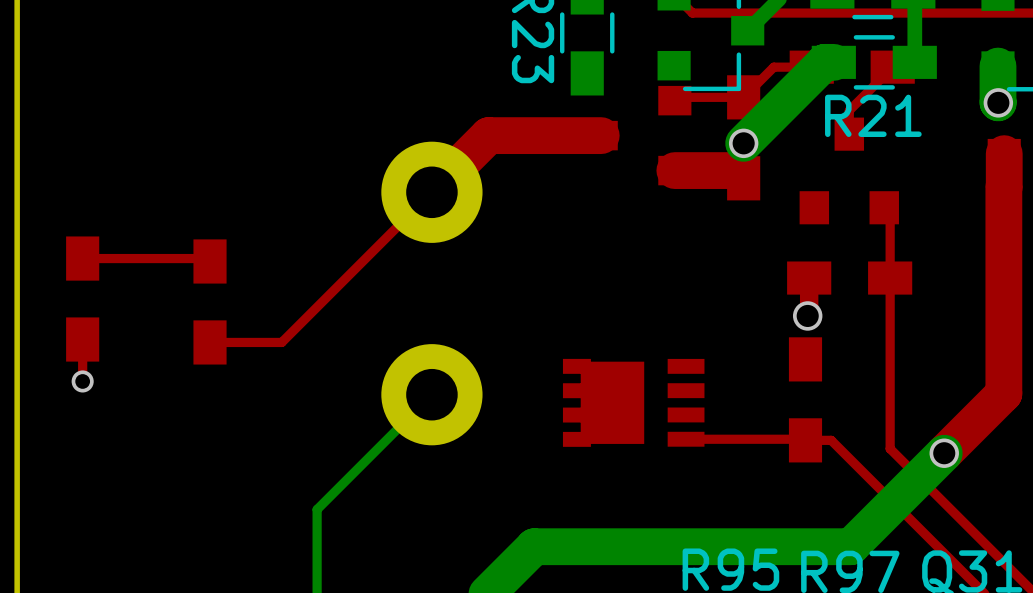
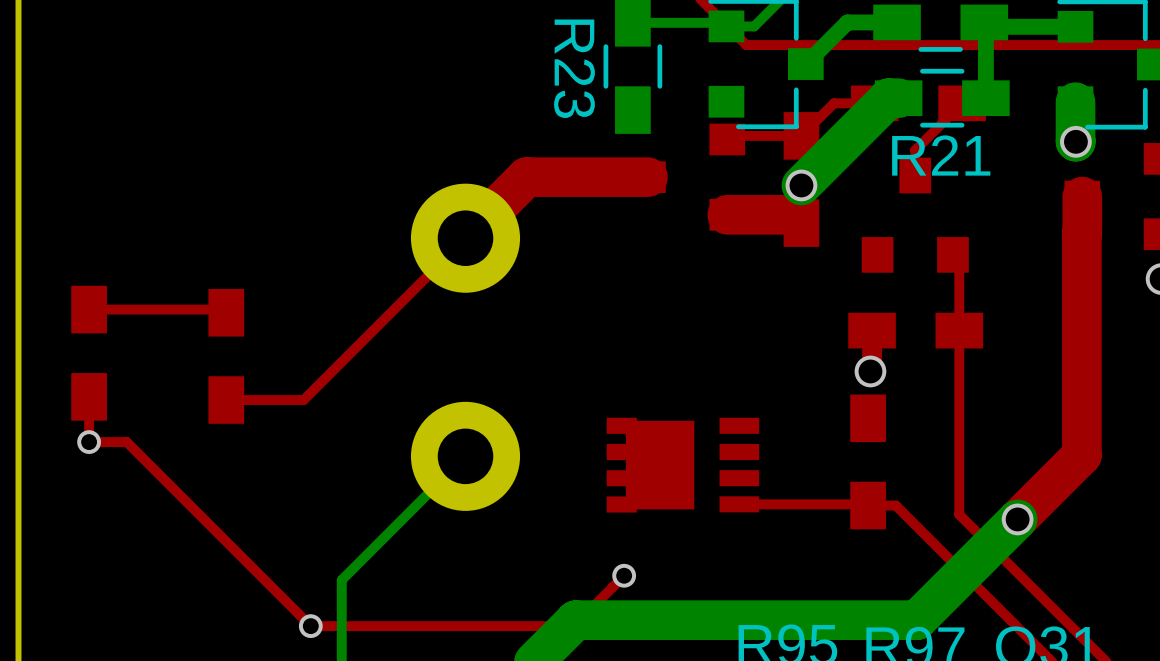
top track: none -> (89, 442) (126, 442) (310, 626) (573, 626) (624, 575)
via: none -> (624, 575)
via: none -> (310, 626)

